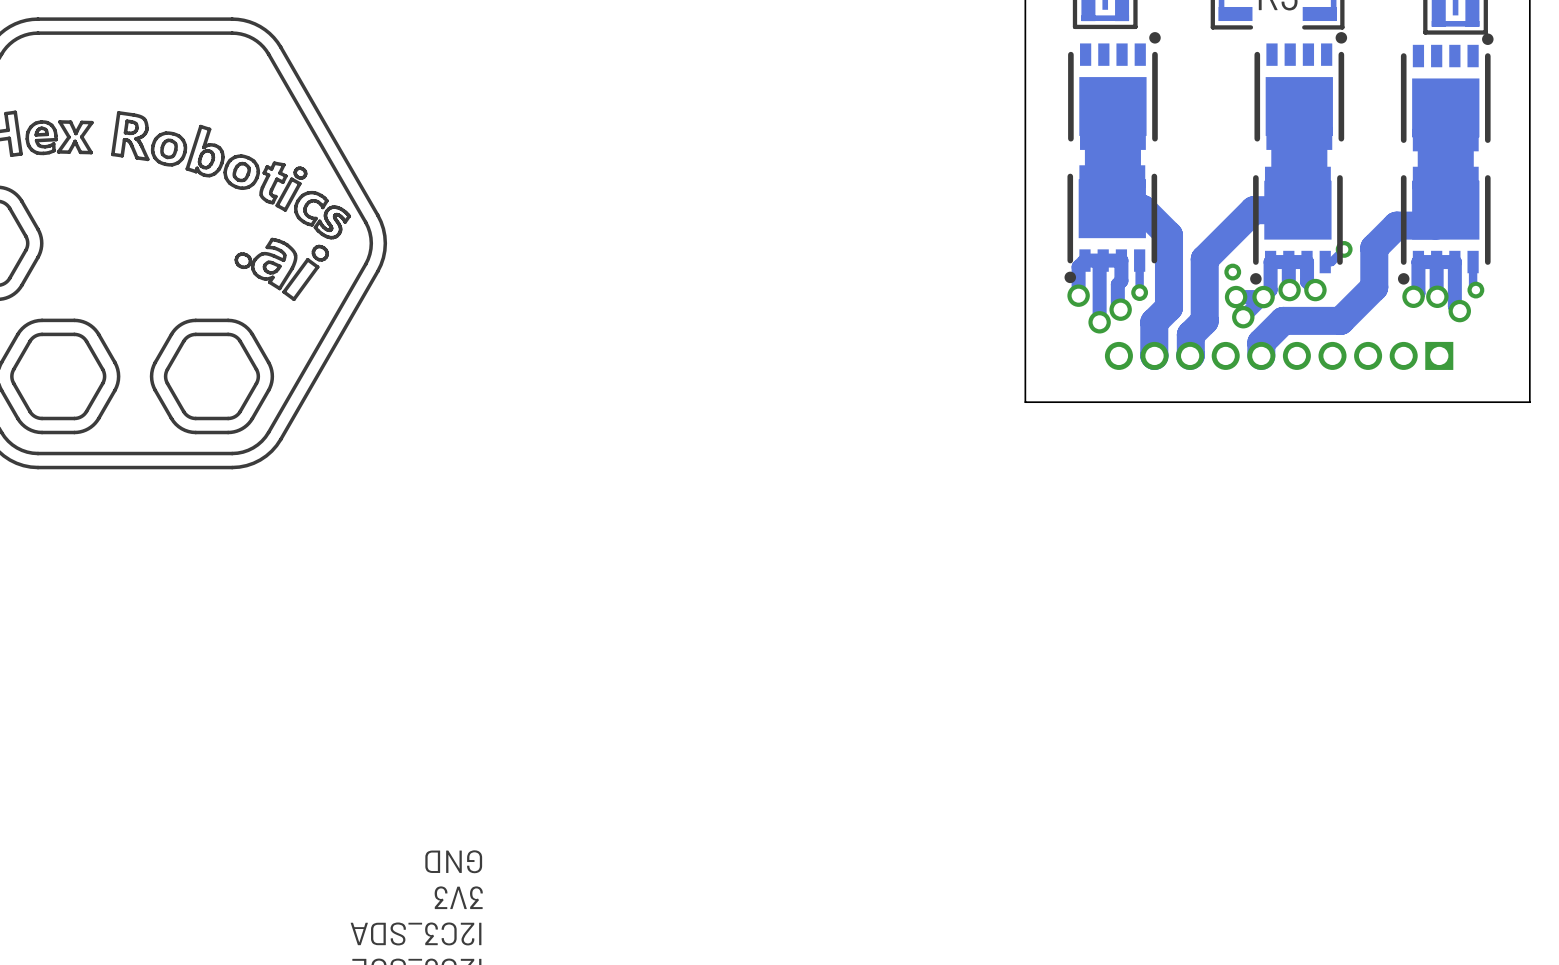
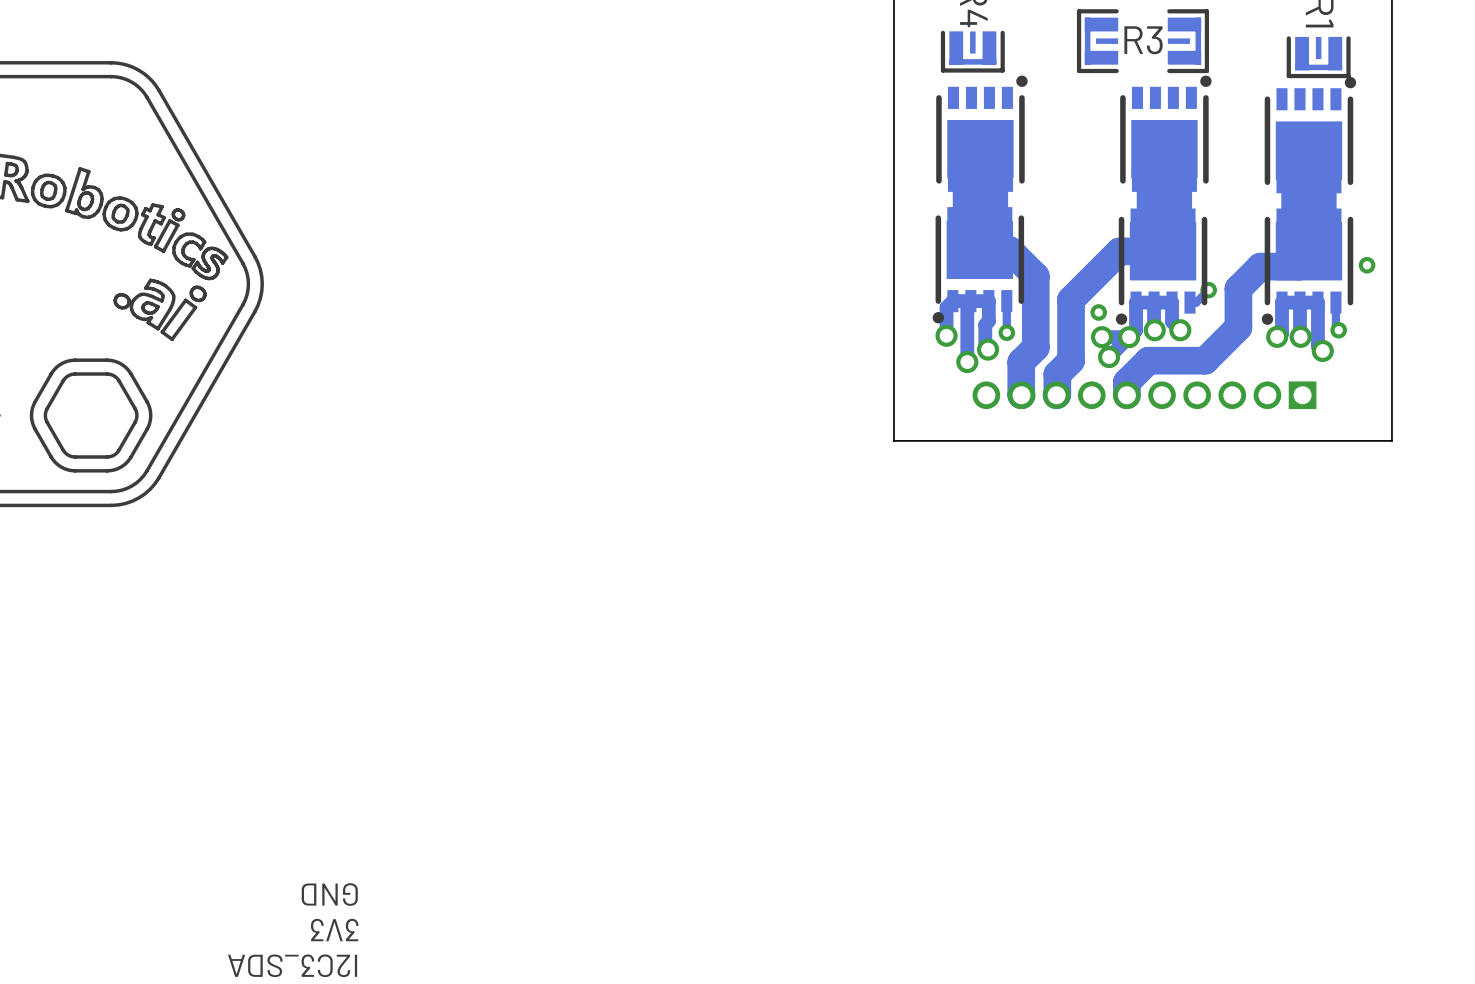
via: none -> (1367, 265)

